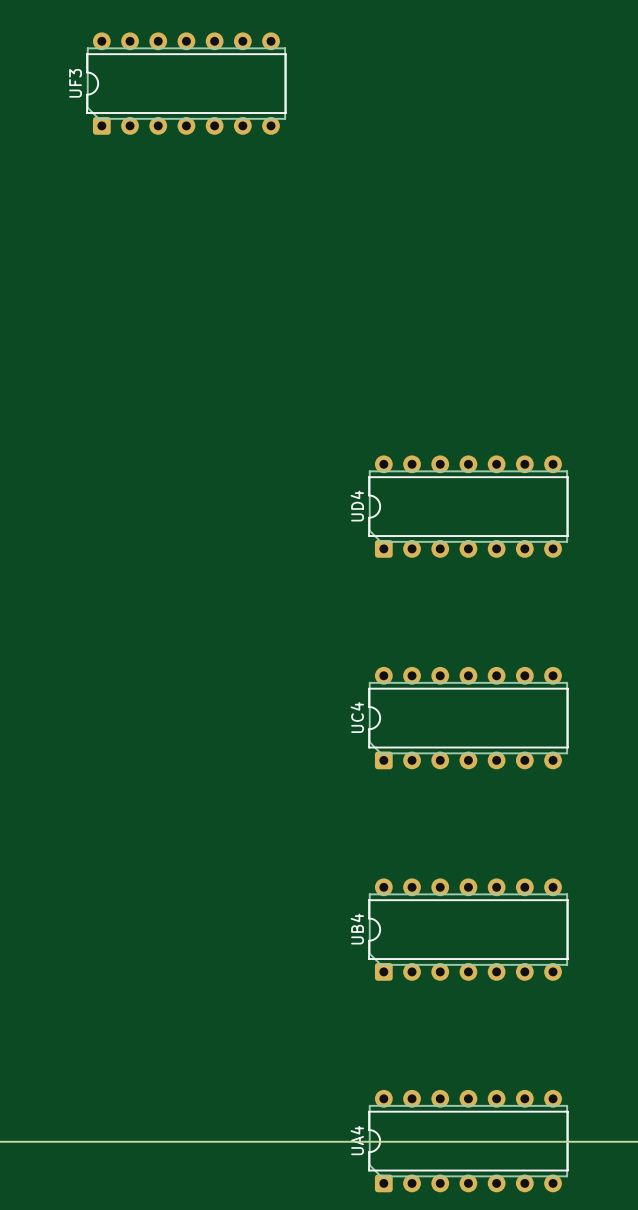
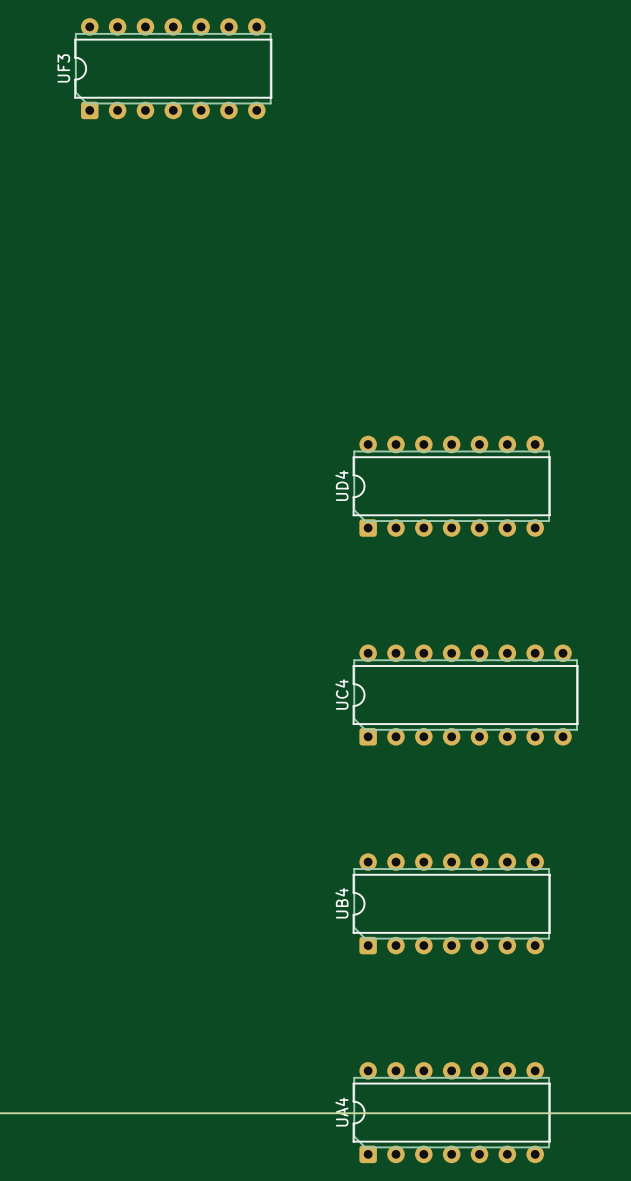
UC4 footprint: [368, 666, 569, 770] -> [352, 644, 579, 746]

